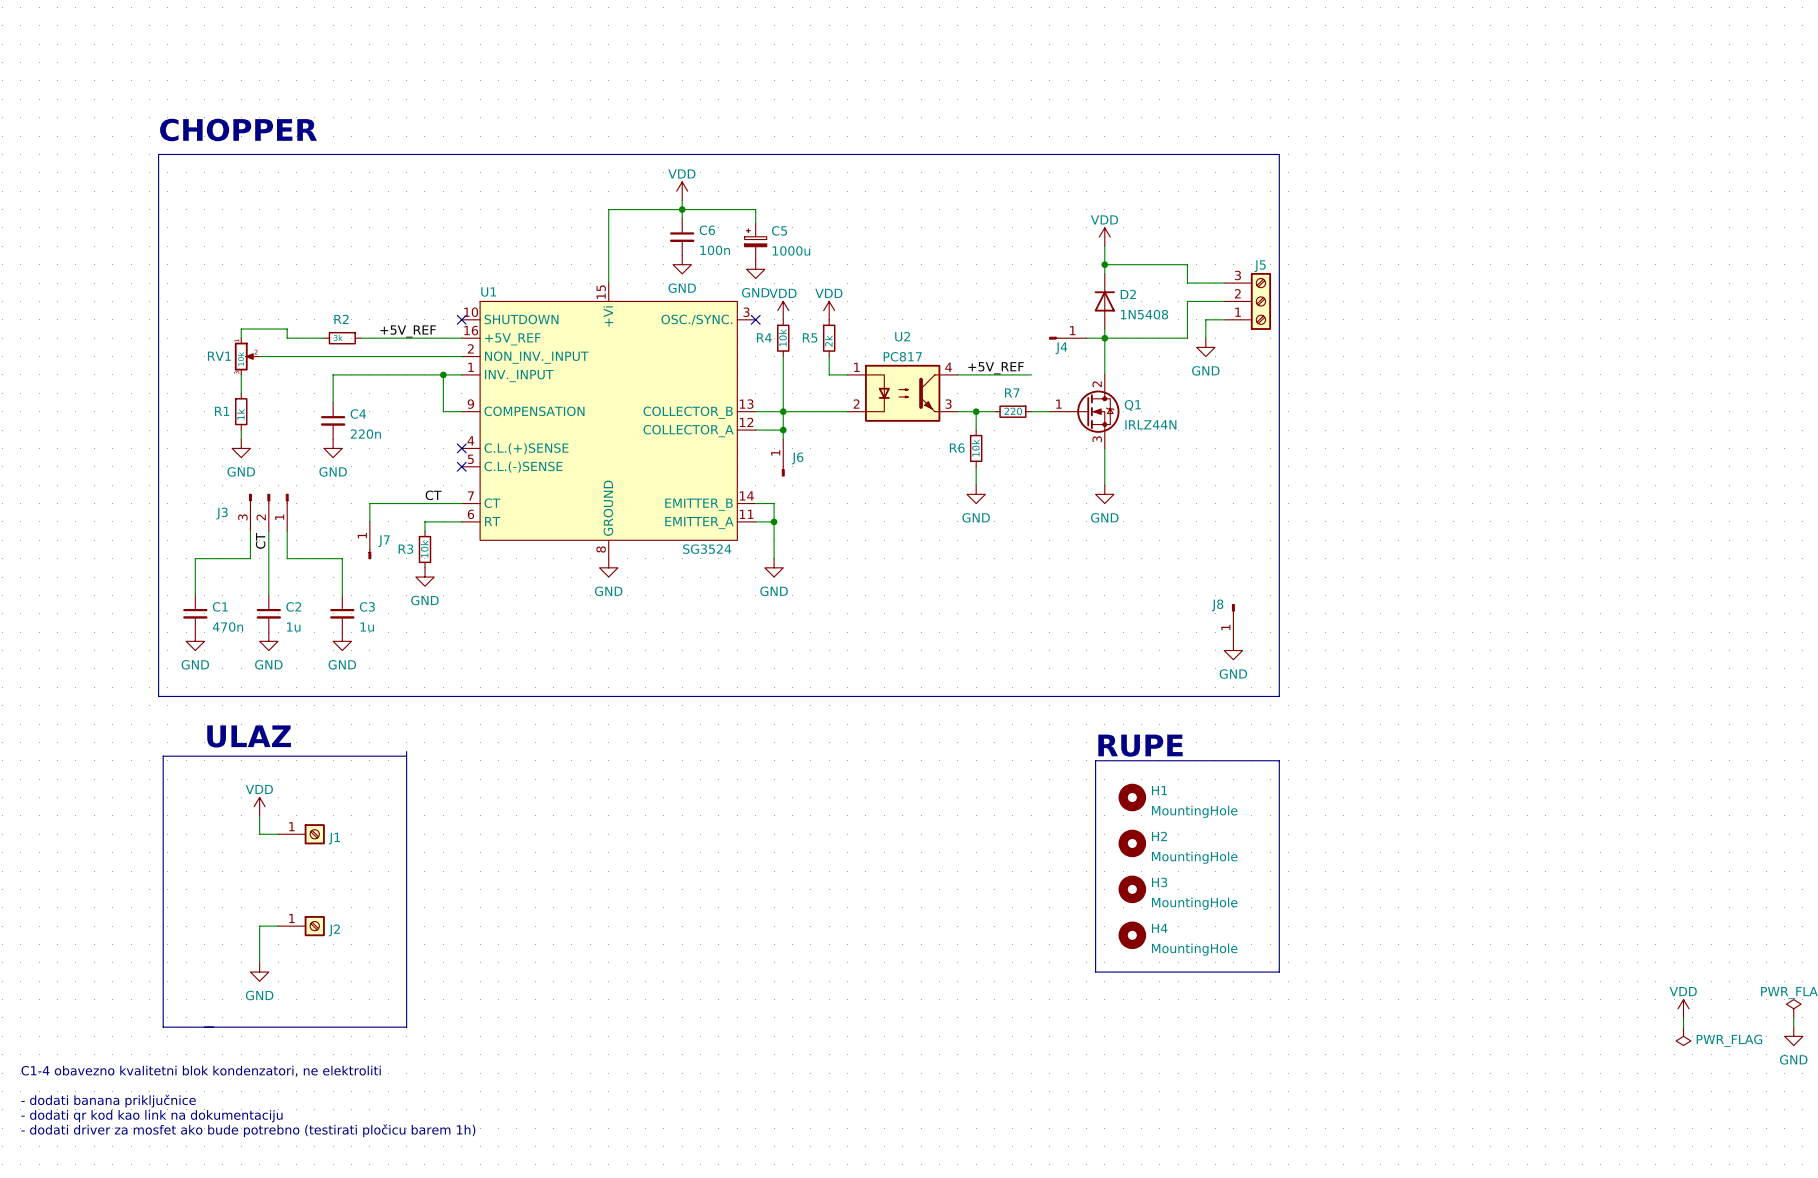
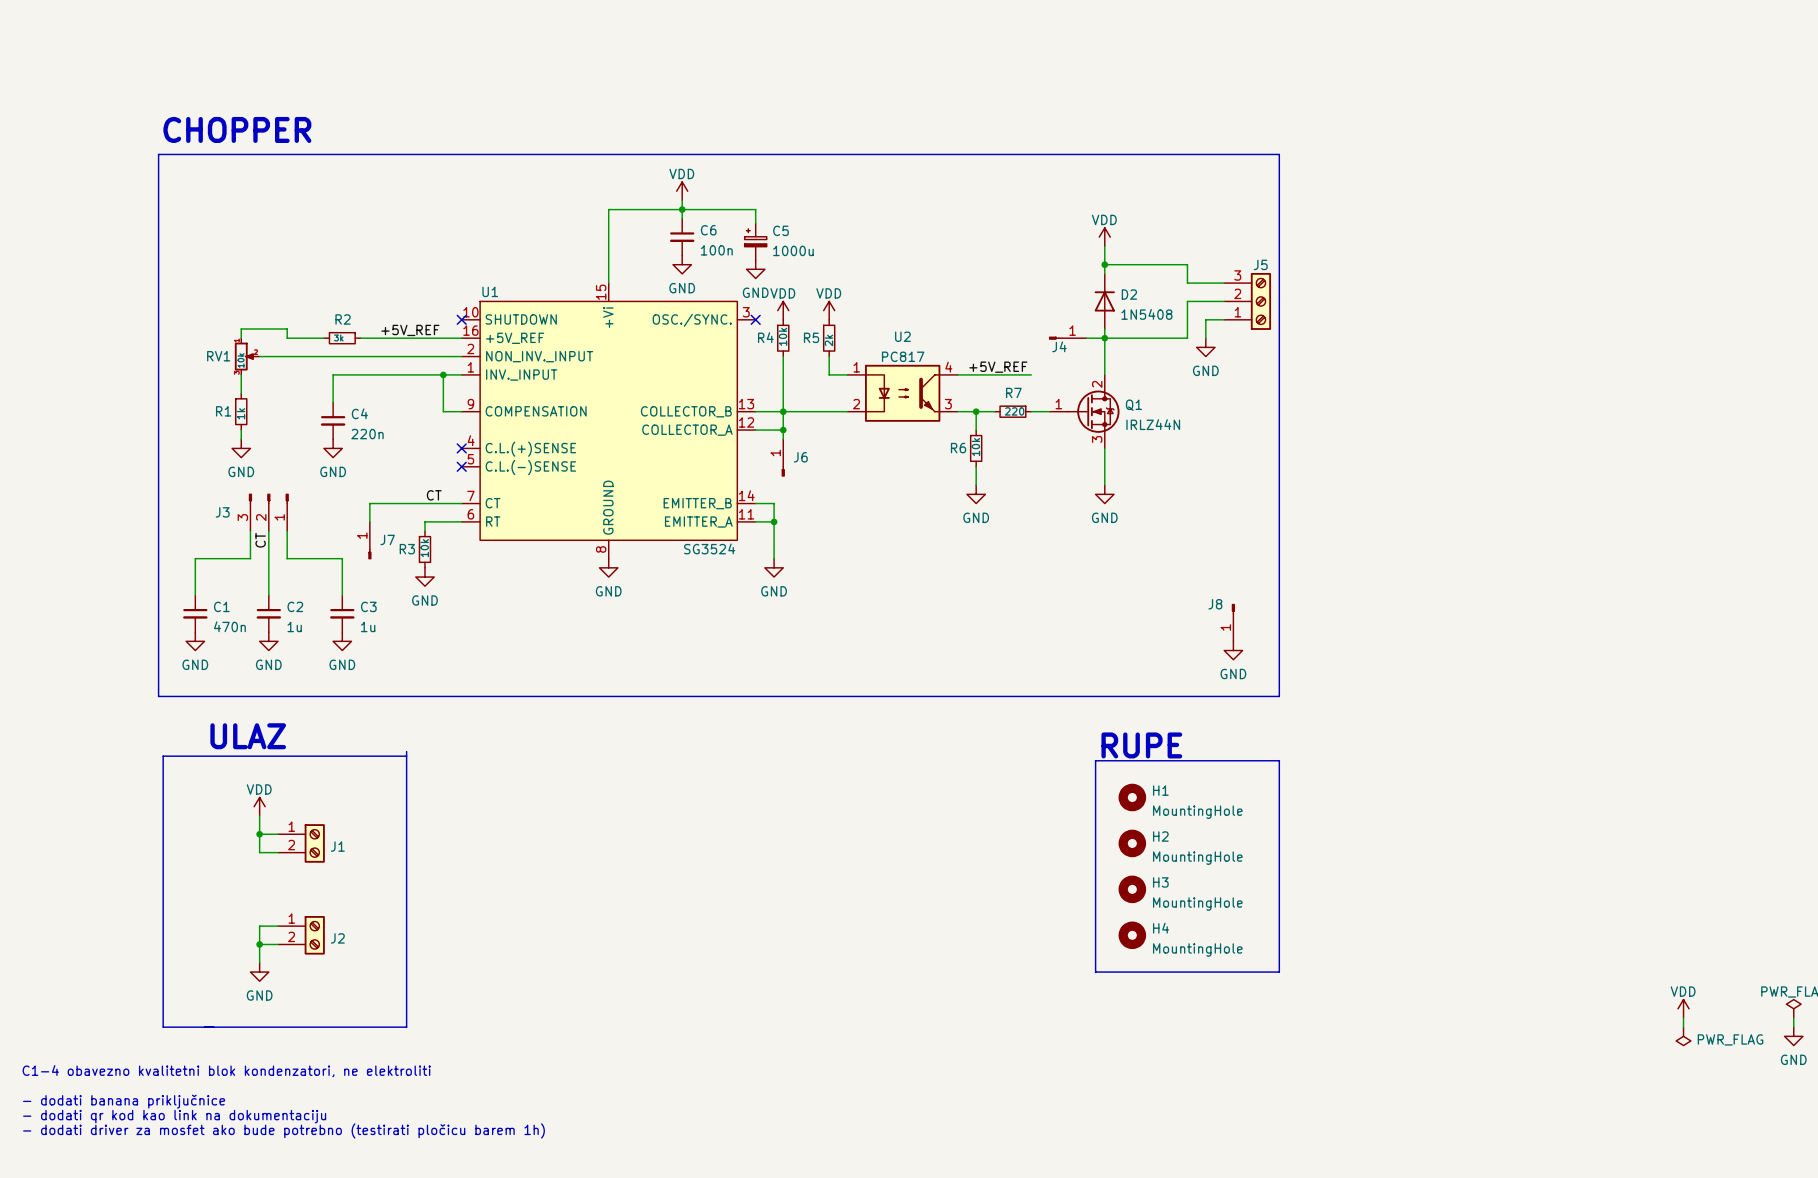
J1 symbol: [278, 824, 325, 845] -> [278, 824, 325, 863]
wire: none -> (259, 834) (259, 852) (278, 852)
junction: none -> (259, 834)
J2 symbol: [278, 916, 325, 937] -> [278, 916, 325, 955]
wire: none -> (259, 944) (278, 944)
junction: none -> (259, 944)

